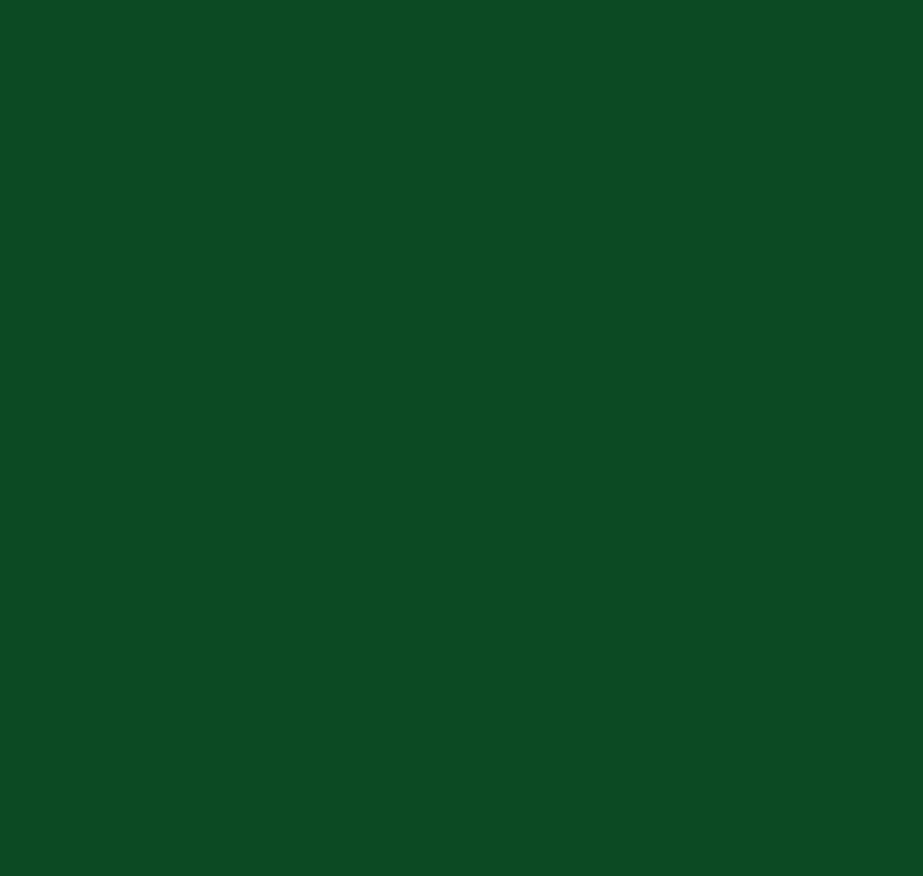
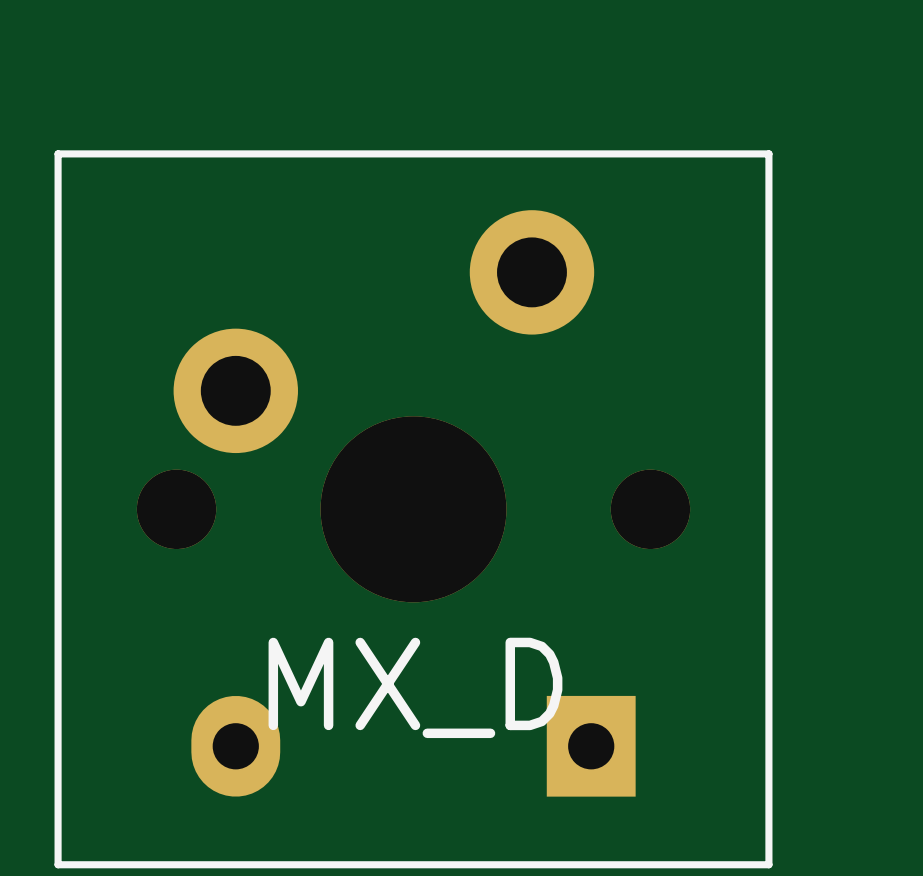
part: none -> MX_D (413, 509)

